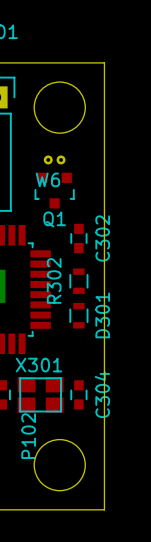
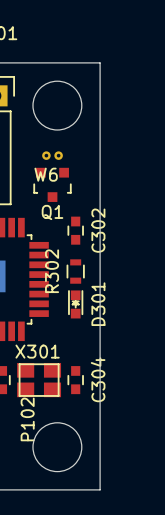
D301 footprint: [69, 302, 89, 329] -> [68, 290, 84, 319]

